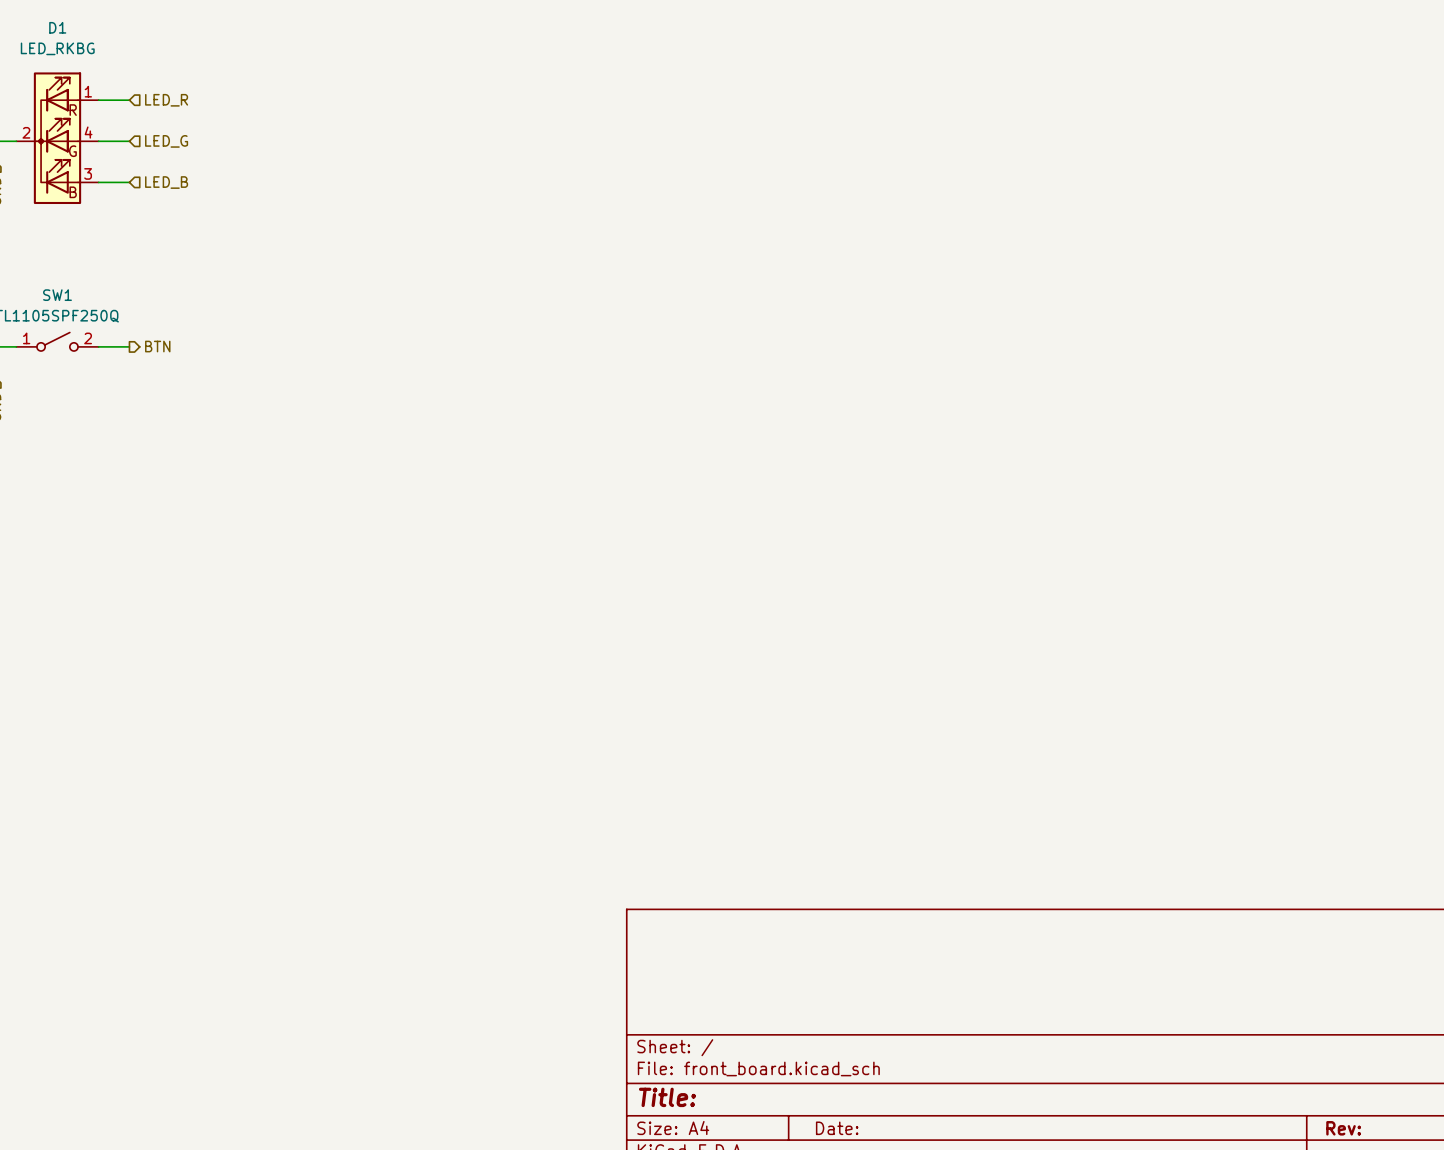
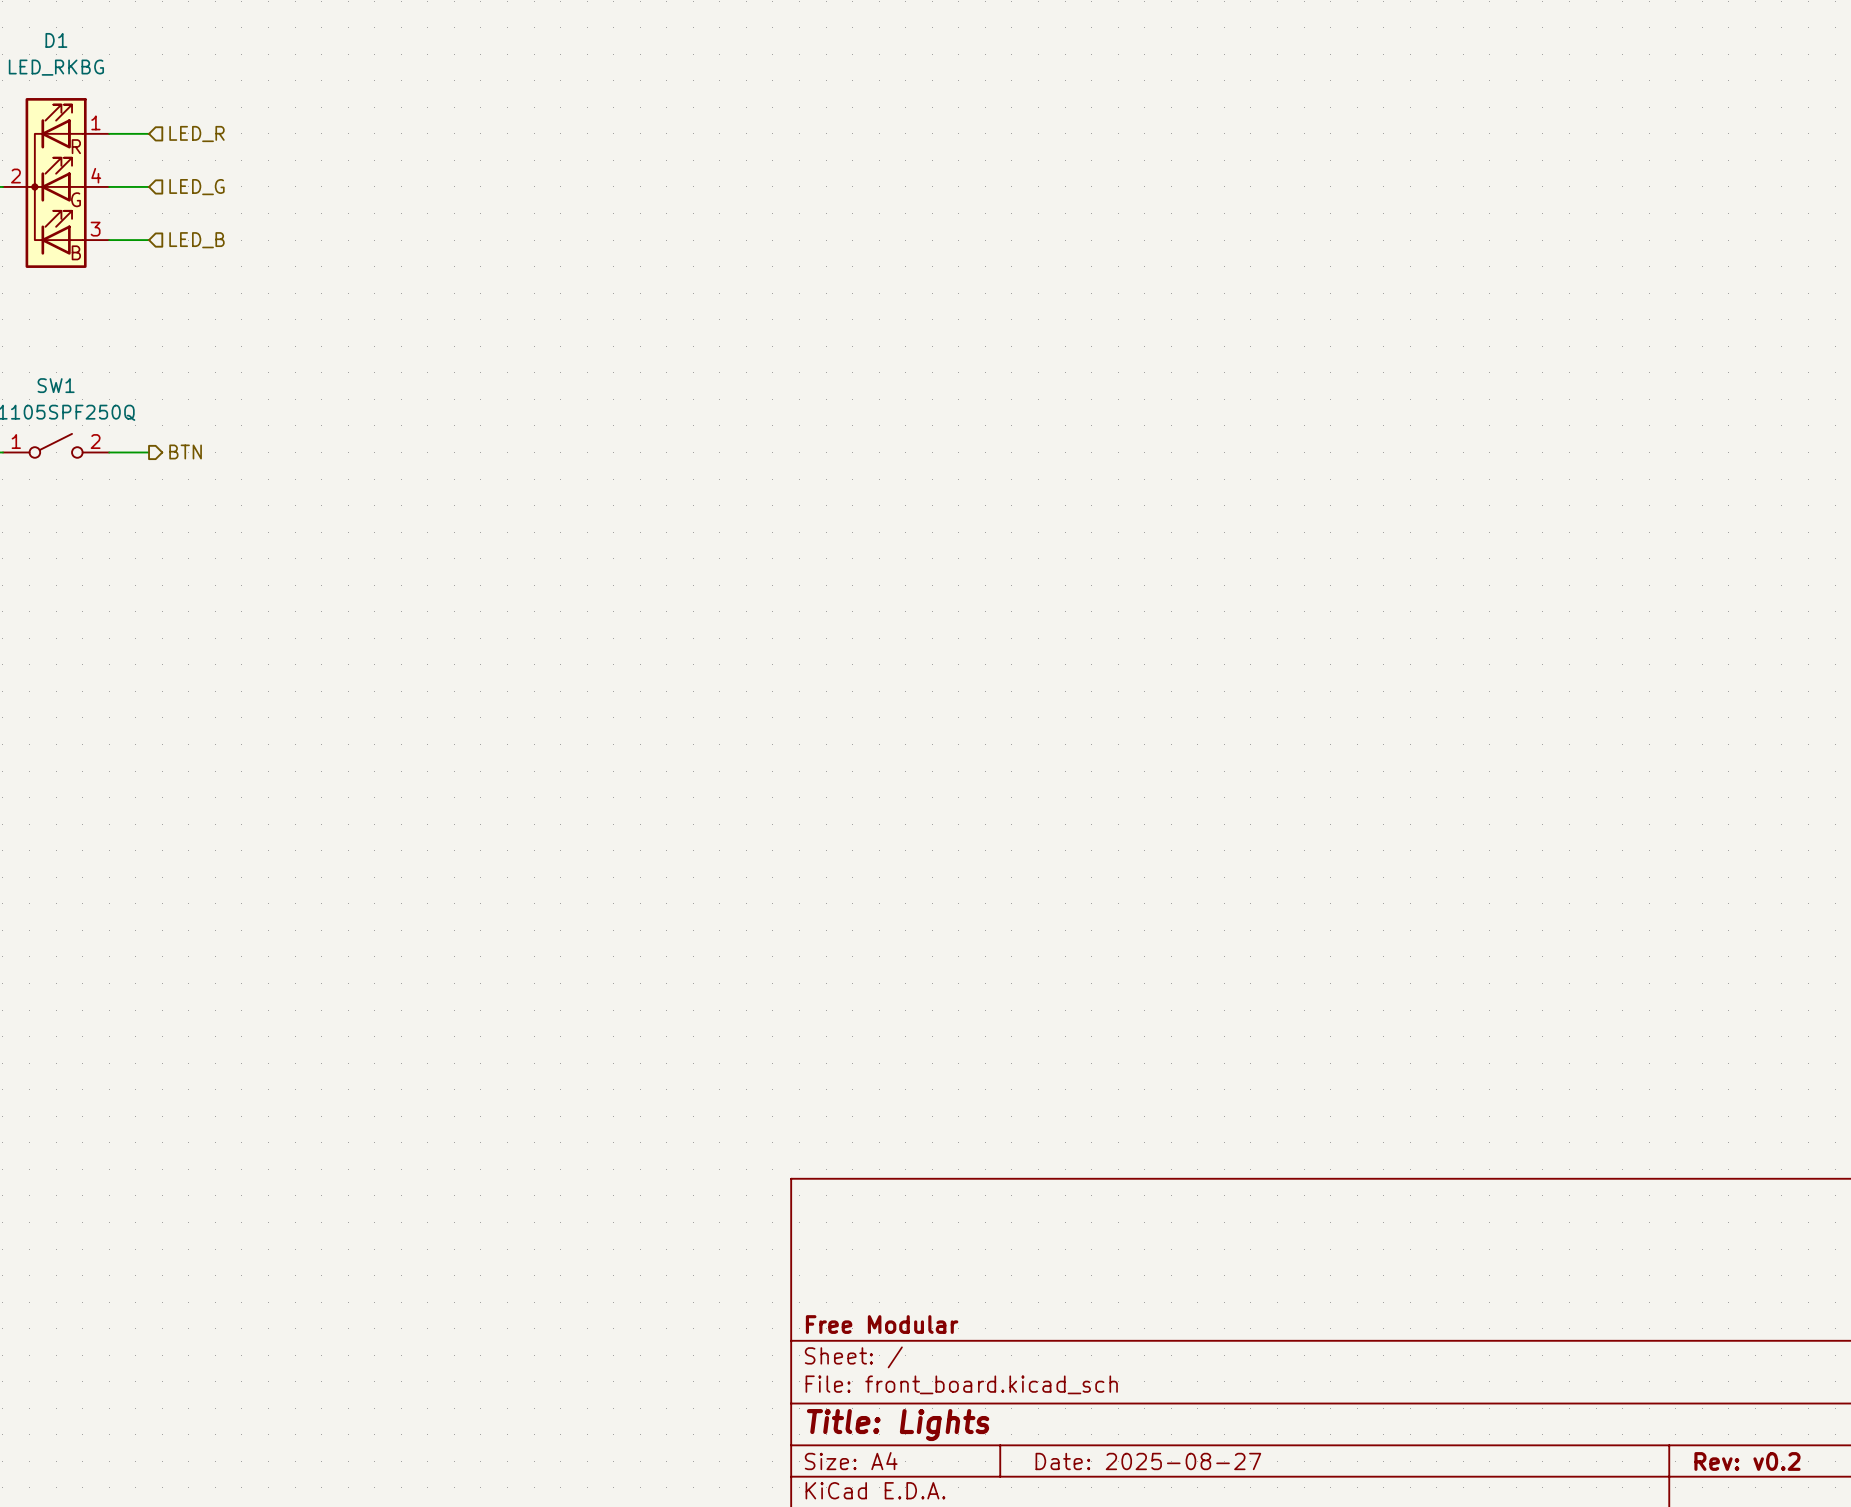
title block: none -> Free Modular (882, 1324)
title block: Title: (667, 1097) -> Title: Lights (898, 1425)
title block: Date: (837, 1128) -> Date: 2025-08-27 (1148, 1461)
title block: Rev: (1343, 1128) -> Rev: v0.2 (1747, 1461)

